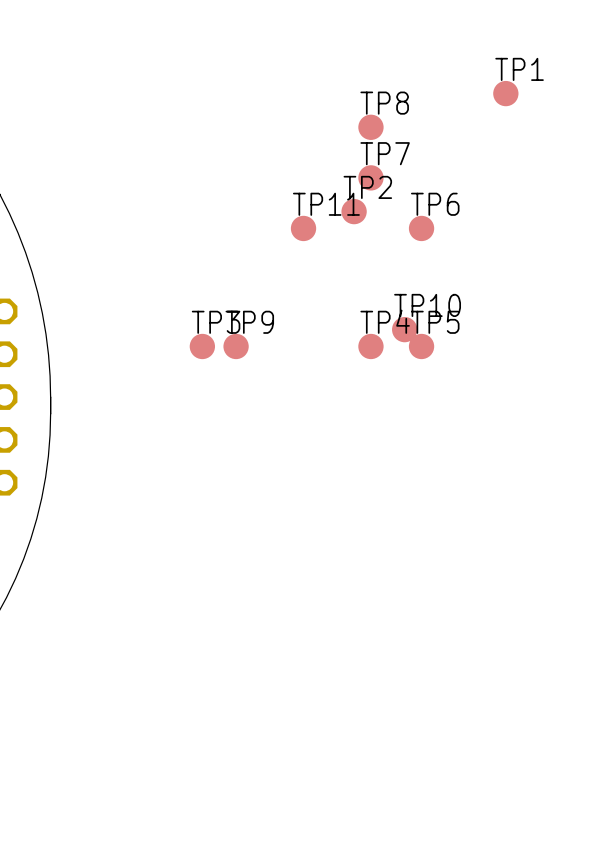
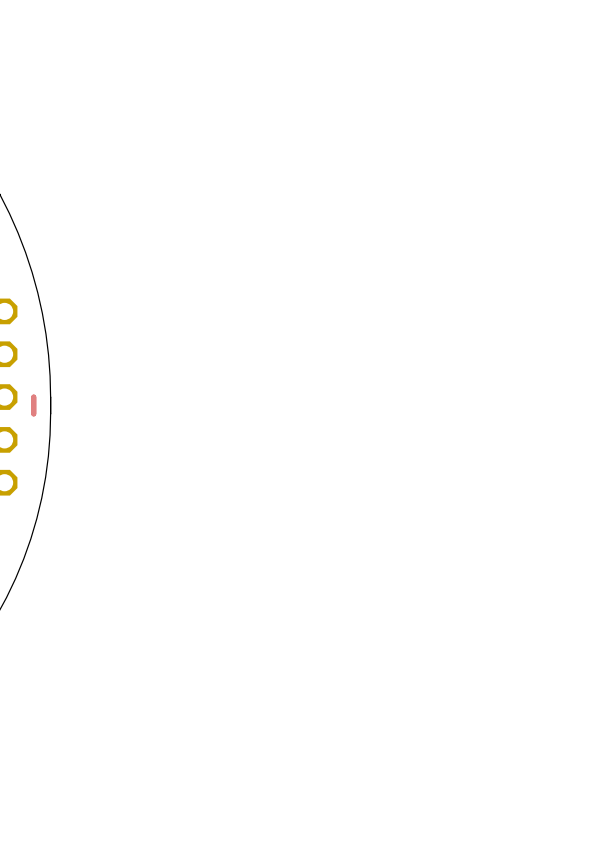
TP1: (505, 93) -> none
TP8: (370, 127) -> none
TP7: (370, 177) -> none
TP2: (354, 211) -> none
TP11: (303, 228) -> none
TP6: (421, 228) -> none
TP10: (404, 329) -> none
TP3: (202, 346) -> none
TP9: (236, 346) -> none
TP4: (370, 346) -> none
TP5: (421, 346) -> none
top track: none -> (33, 397) (33, 413)

